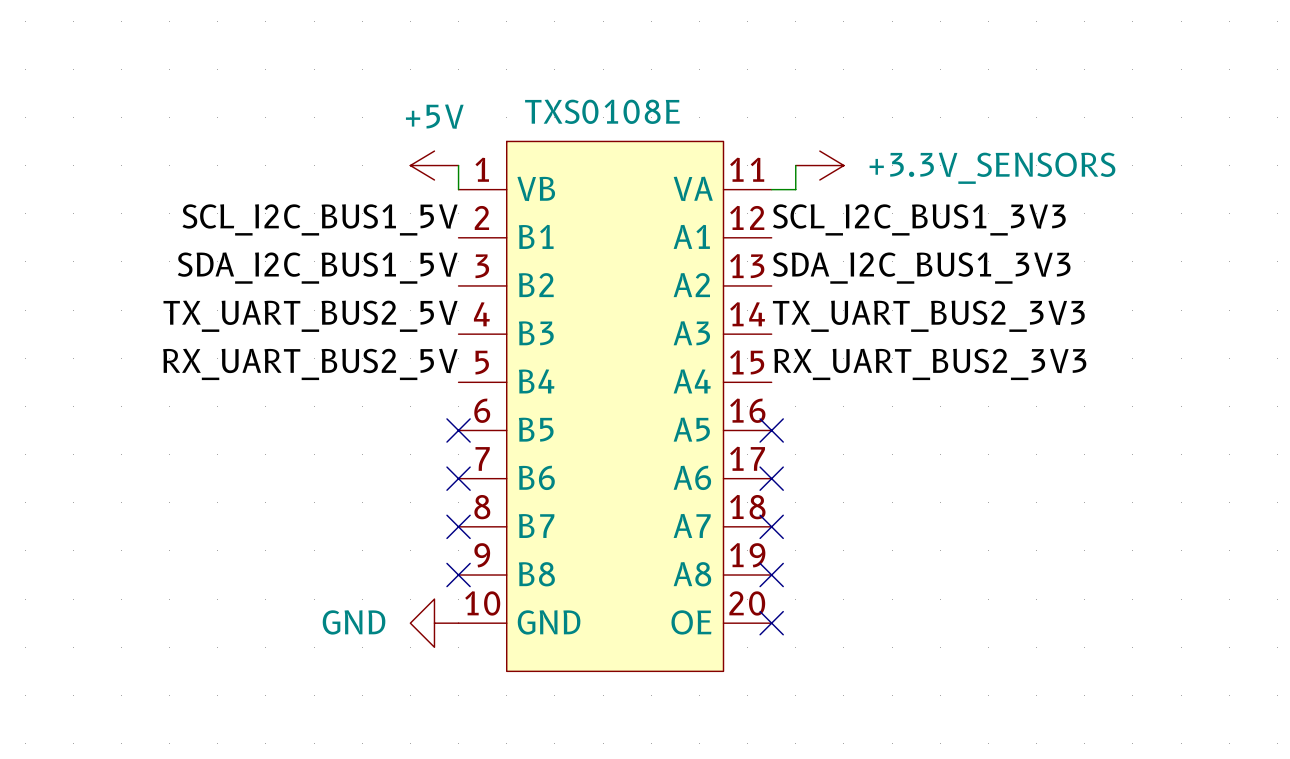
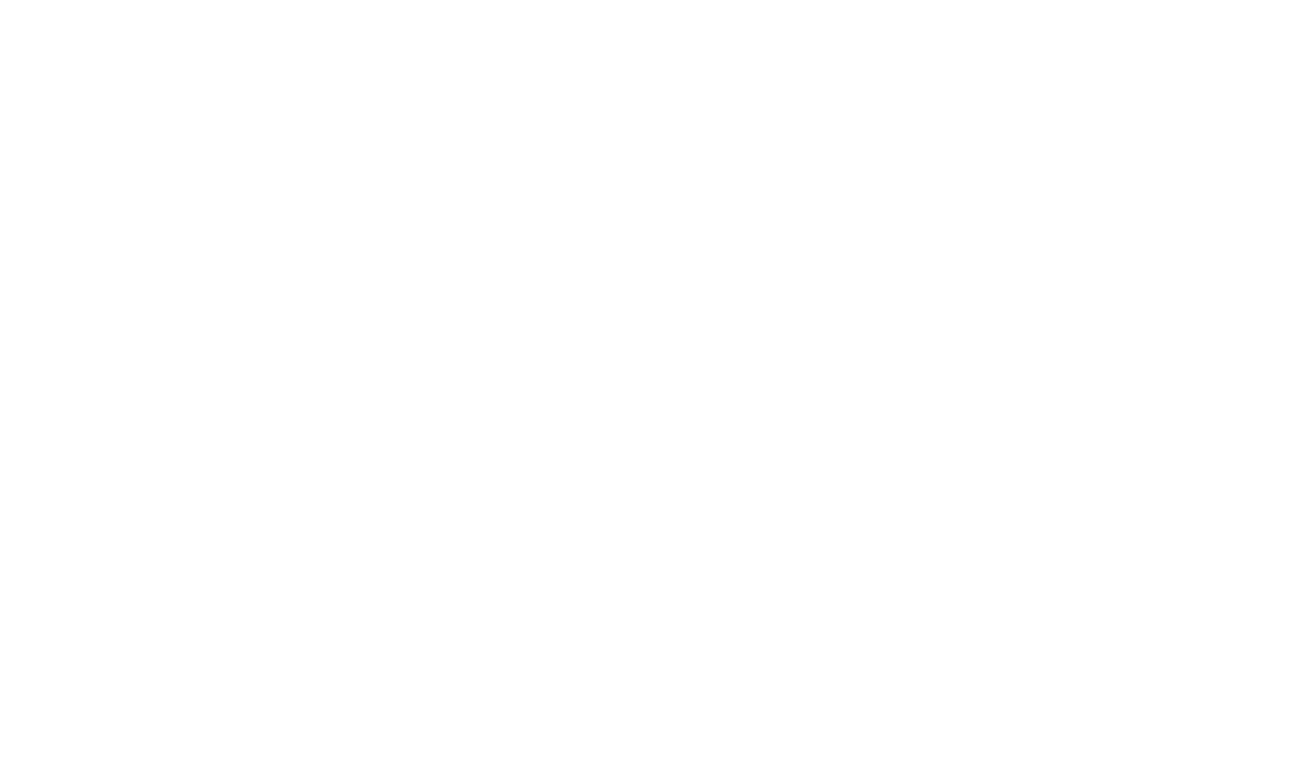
power symbol: +5V (434, 165) -> none
wire: (458, 165) (458, 189) -> none
wire: (795, 165) (795, 189) (771, 189) -> none
power symbol: +3.3V_SENSORS (819, 165) -> none
label: SCL_I2C_BUS1_5V (320, 219) -> none
label: SCL_I2C_BUS1_3V3 (919, 219) -> none
label: SDA_I2C_BUS1_5V (317, 268) -> none
label: SDA_I2C_BUS1_3V3 (921, 268) -> none
label: TX_UART_BUS2_5V (310, 316) -> none
label: TX_UART_BUS2_3V3 (928, 316) -> none
label: RX_UART_BUS2_5V (310, 364) -> none
label: RX_UART_BUS2_3V3 (930, 364) -> none
part: TXS0108E (615, 406) -> none
no-connect mark: (458, 430) -> none
no-connect mark: (771, 430) -> none
no-connect mark: (458, 478) -> none
no-connect mark: (771, 478) -> none
no-connect mark: (458, 526) -> none
no-connect mark: (771, 526) -> none
no-connect mark: (458, 575) -> none
no-connect mark: (771, 575) -> none
power symbol: GND (434, 623) -> none
no-connect mark: (771, 623) -> none

